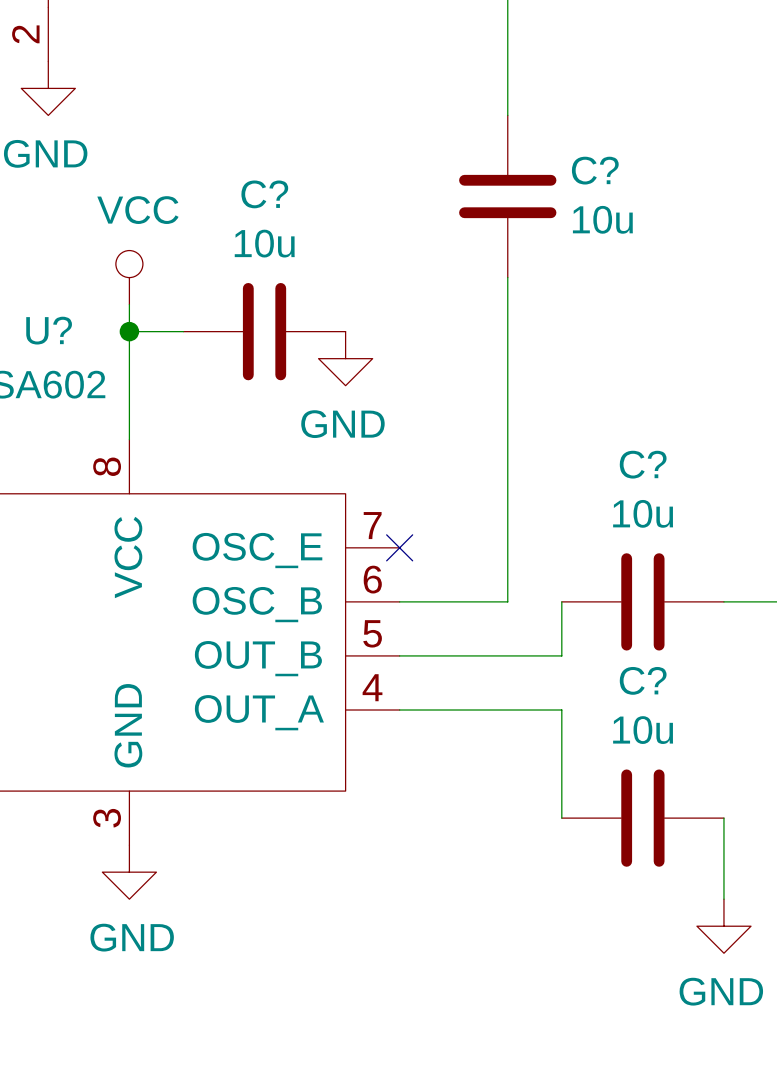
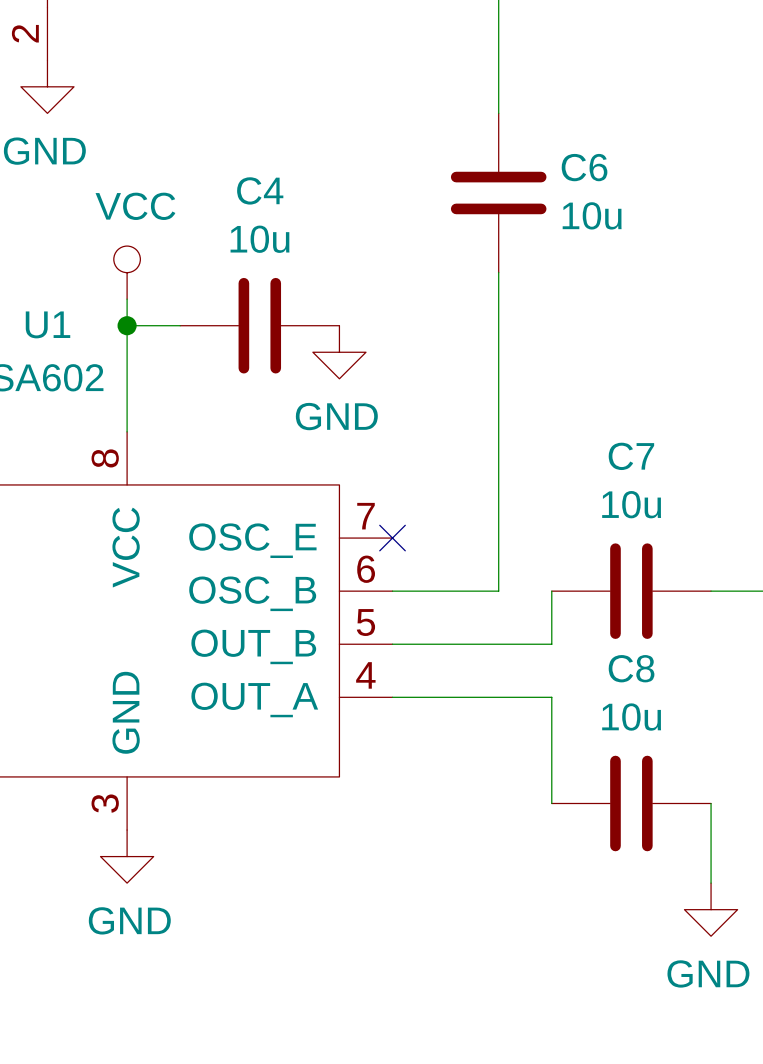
C? name: C? (595, 170) -> C6 (584, 167)
C? name: C? (264, 194) -> C4 (260, 190)
U? name: U? (49, 330) -> U1 (48, 324)
C? name: C? (643, 464) -> C7 (631, 456)
C? name: C? (643, 680) -> C8 (631, 668)

